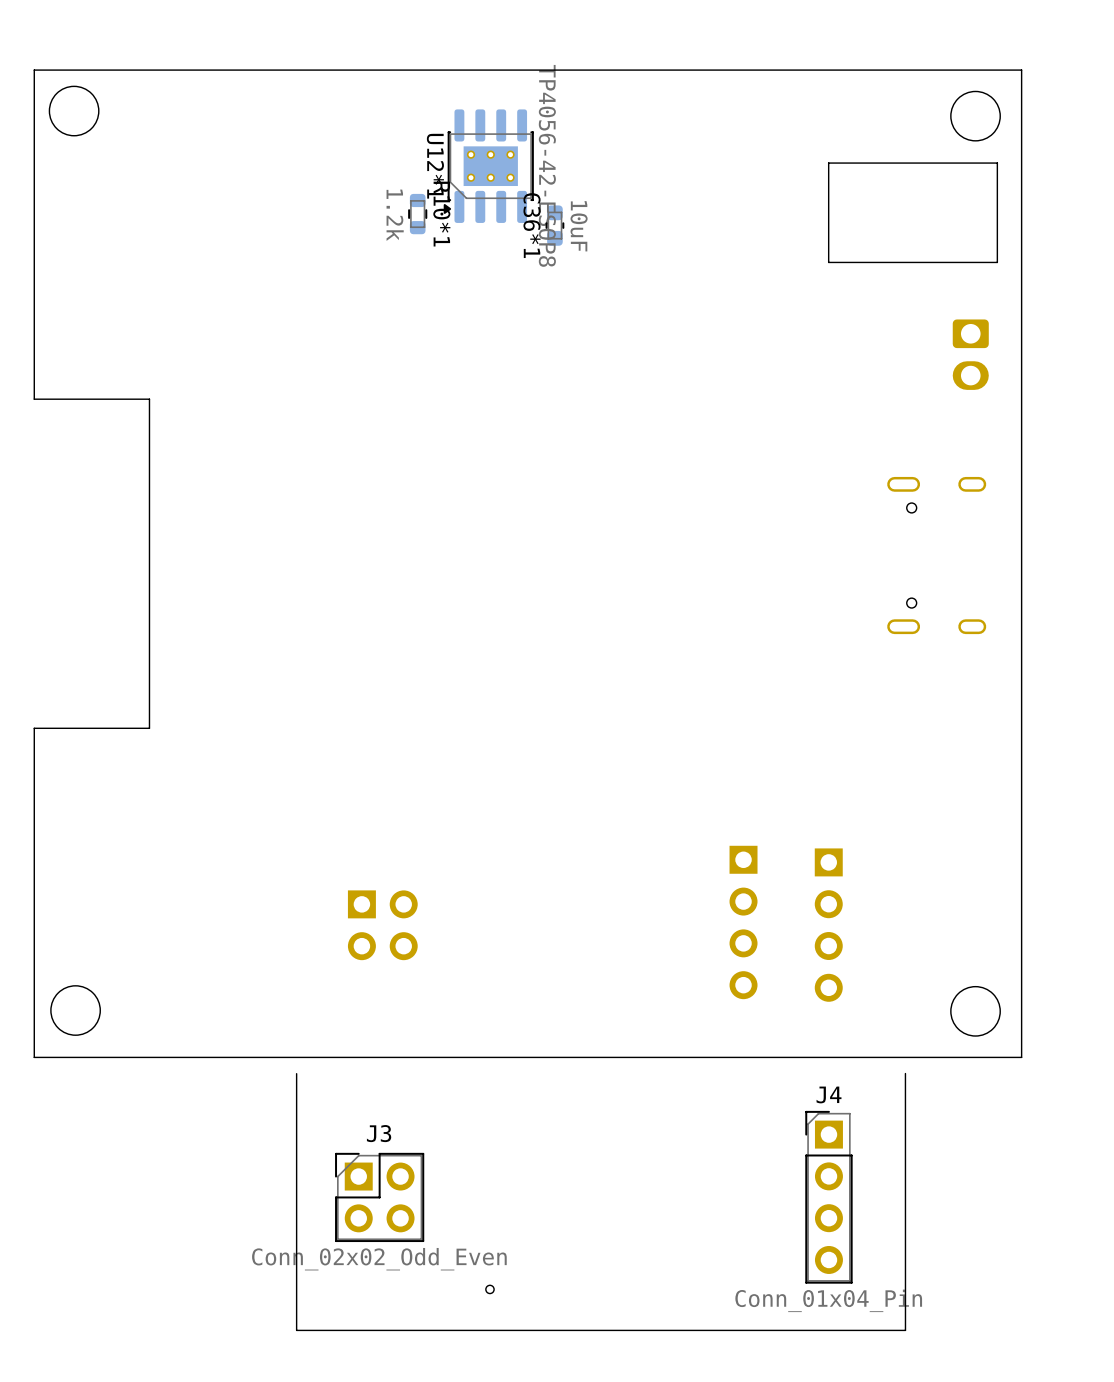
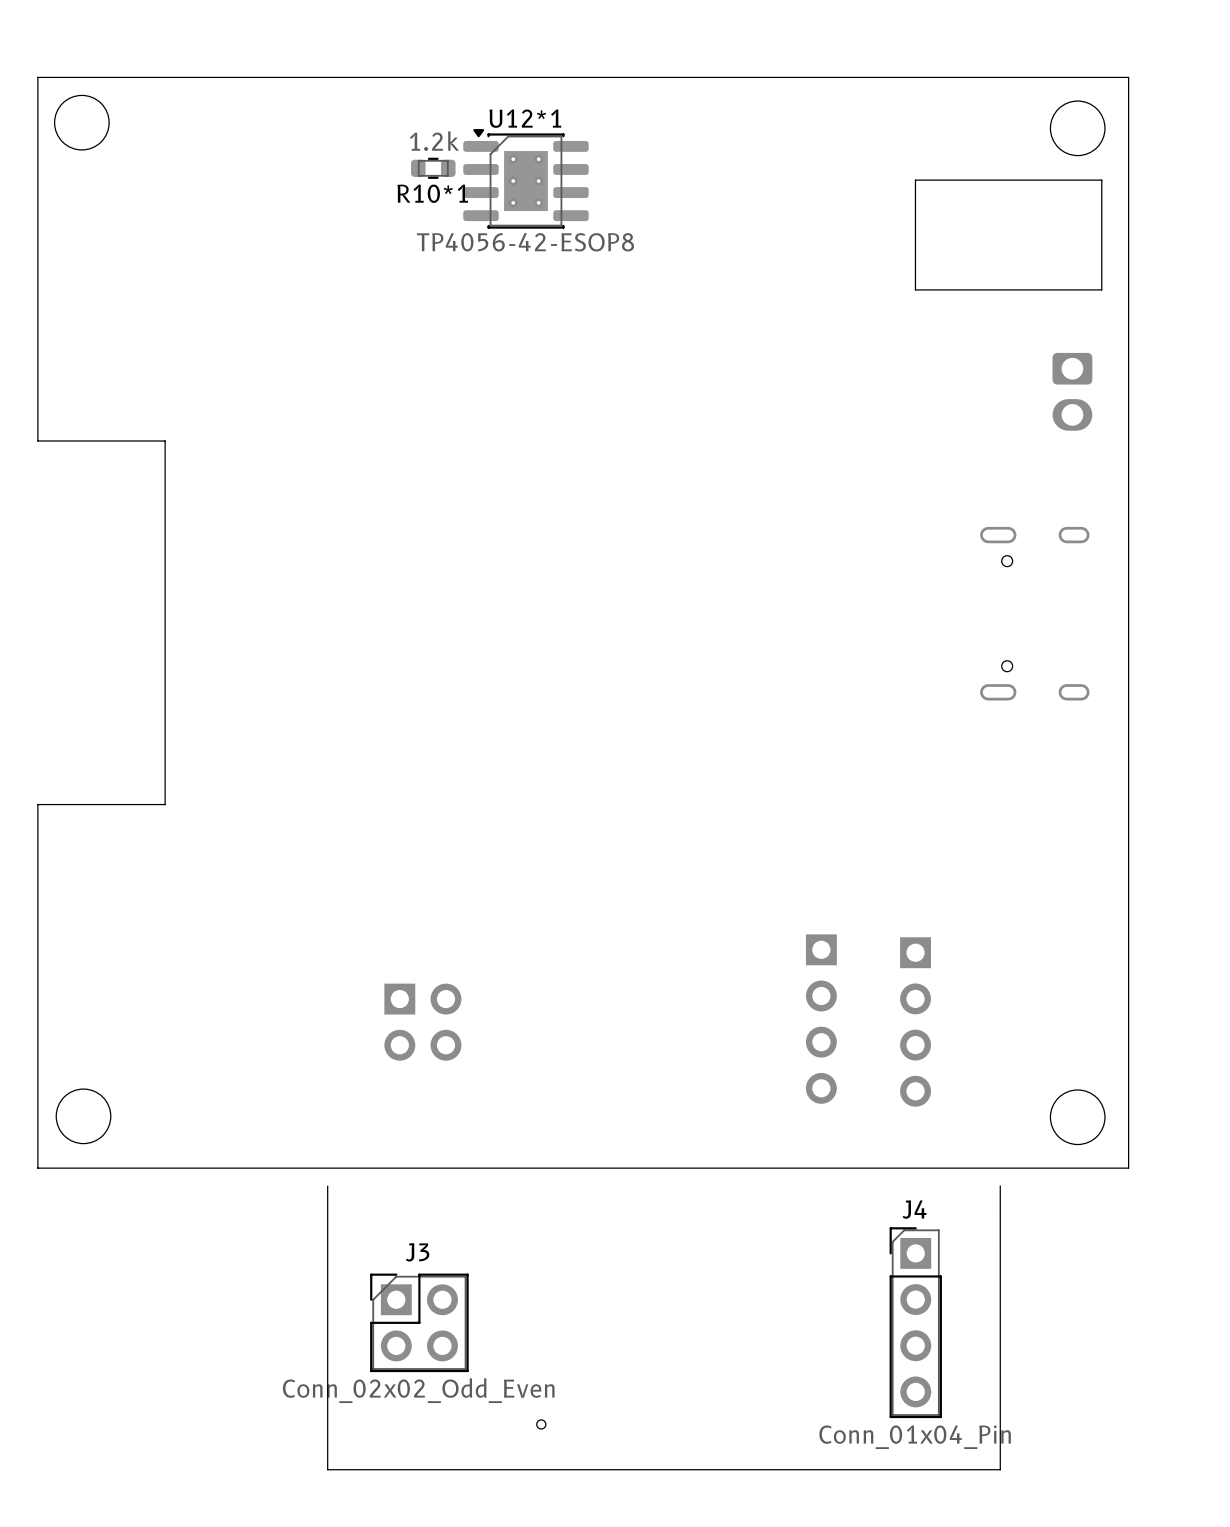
U12*1 footprint: [443, 109, 534, 223] -> [463, 129, 589, 229]
U12*1 value position: TP4056-42-ESOP8 (547, 165) -> TP4056-42-ESOP8 (525, 242)
U12*1 name position: U12*1 (435, 166) -> U12*1 (525, 118)
R10*1 rotation: 0° (417, 214) -> 90° clockwise (433, 168)
R10*1 position: (417, 214) -> (433, 168)
C36*1: 10uF (554, 225) -> none

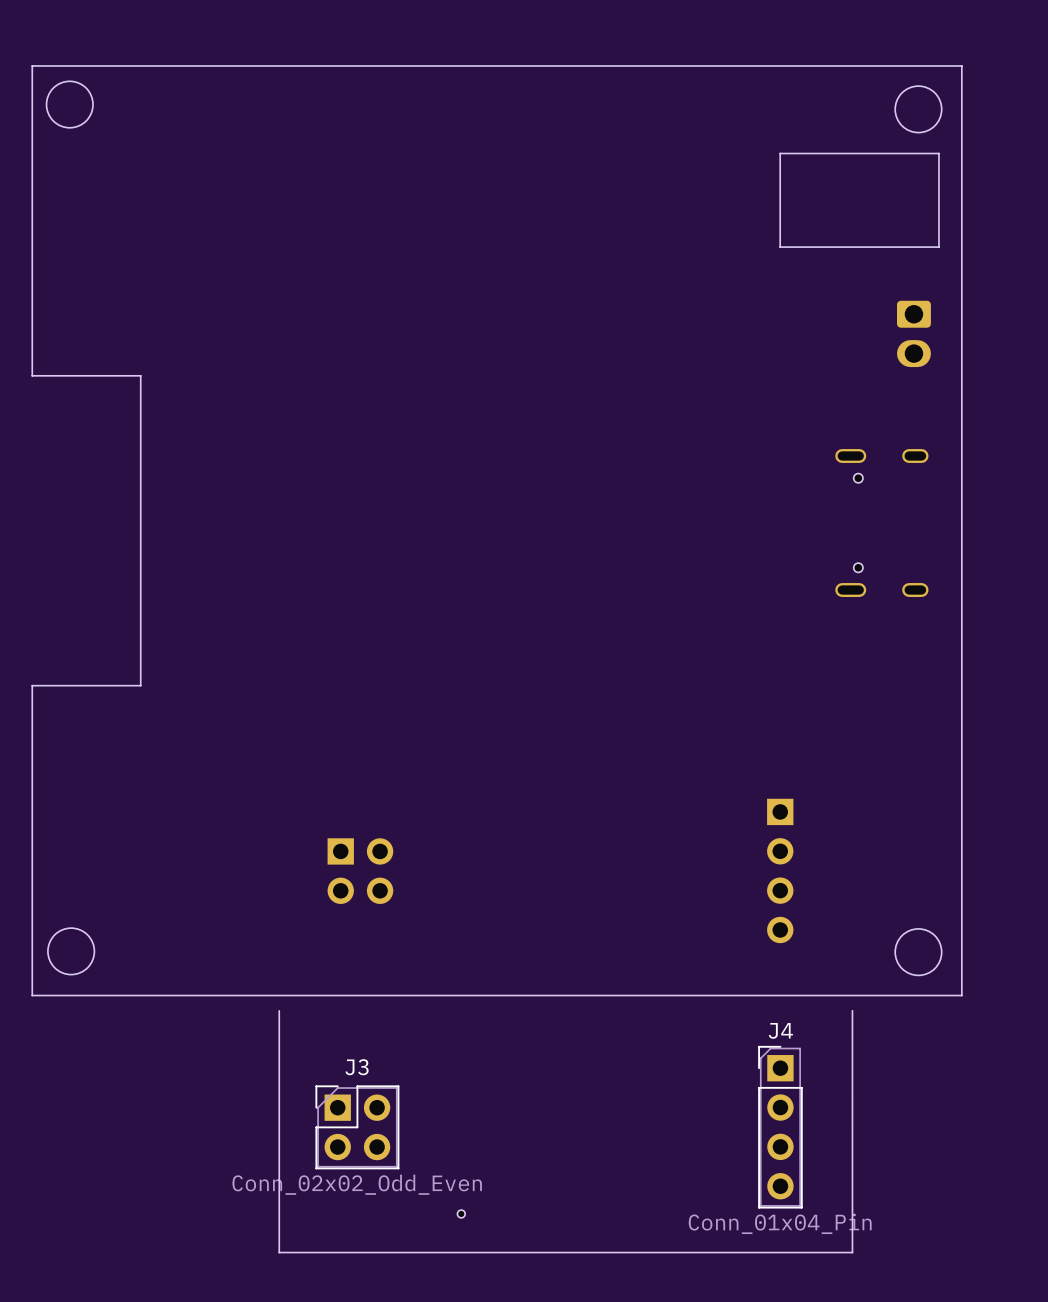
R10*1: 1.2k (433, 168) -> none
U12*1: TP4056-42-ESOP8 (525, 178) -> none
part: (821, 1019) -> none

